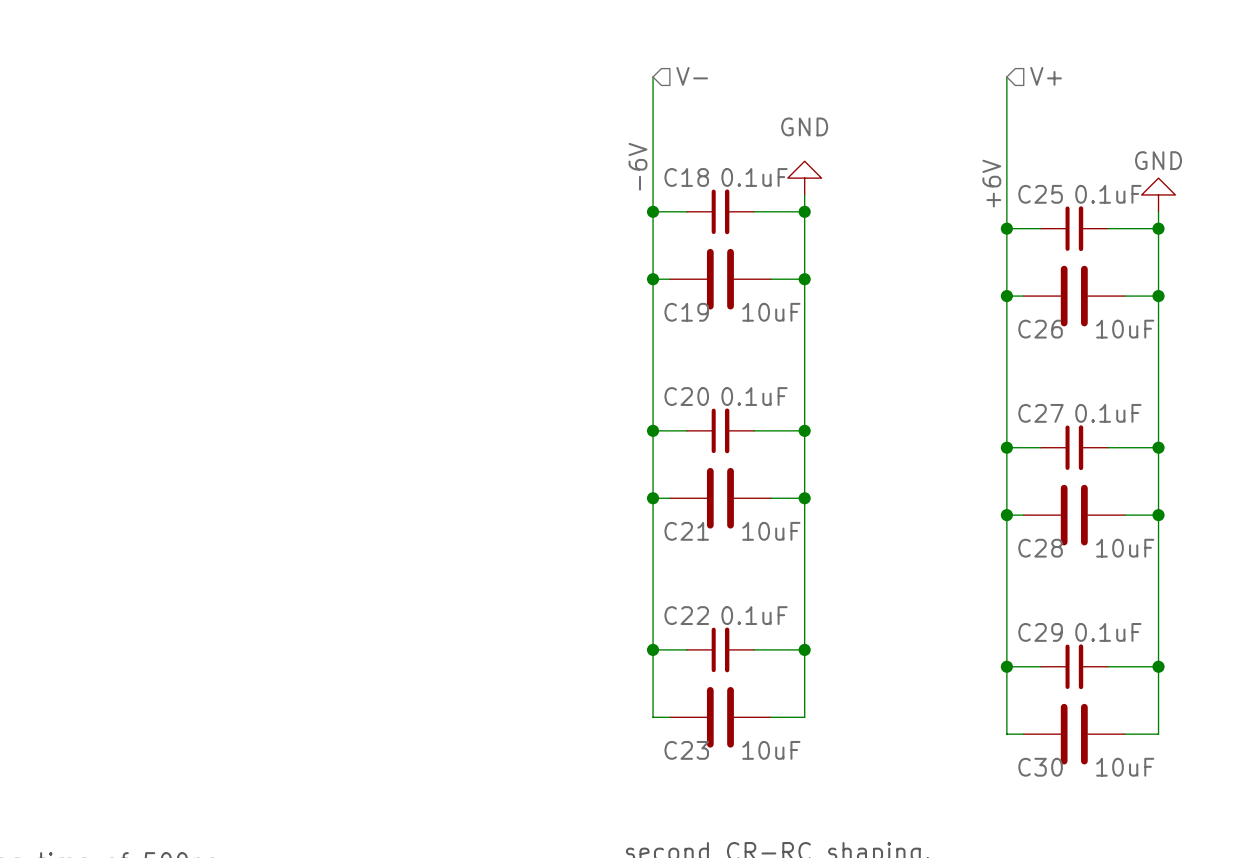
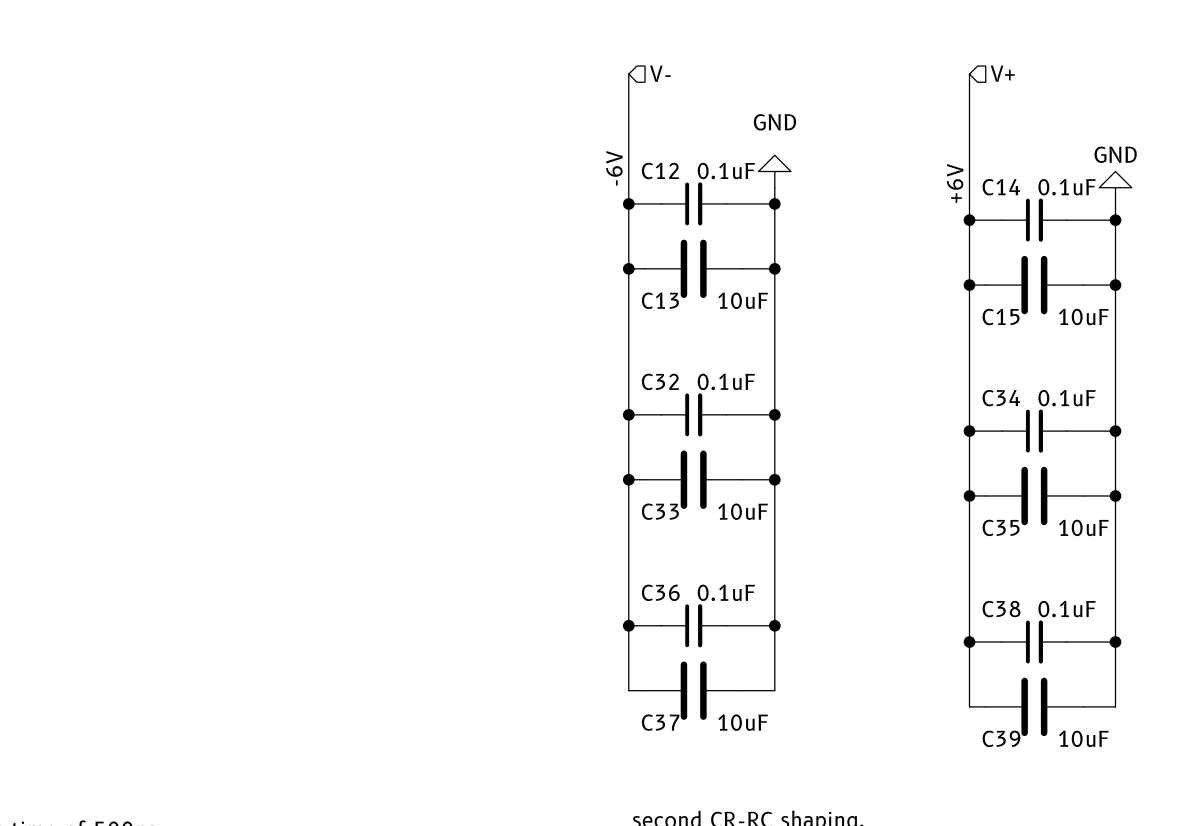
C18 name: C18 (686, 177) -> C12 (660, 170)
C25 name: C25 (1040, 194) -> C14 (1001, 187)
C19 name: C19 (686, 312) -> C13 (660, 300)
C26 name: C26 (1040, 329) -> C15 (1001, 317)
C20 name: C20 (686, 396) -> C32 (660, 381)
C27 name: C27 (1040, 413) -> C34 (1001, 398)
C21 name: C21 (686, 531) -> C33 (660, 511)
C28 name: C28 (1040, 548) -> C35 (1001, 527)
C22 name: C22 (686, 615) -> C36 (660, 592)
C29 name: C29 (1040, 632) -> C38 (1001, 609)
C23 name: C23 (686, 750) -> C37 (660, 722)
C30 name: C30 (1040, 767) -> C39 (1001, 738)

